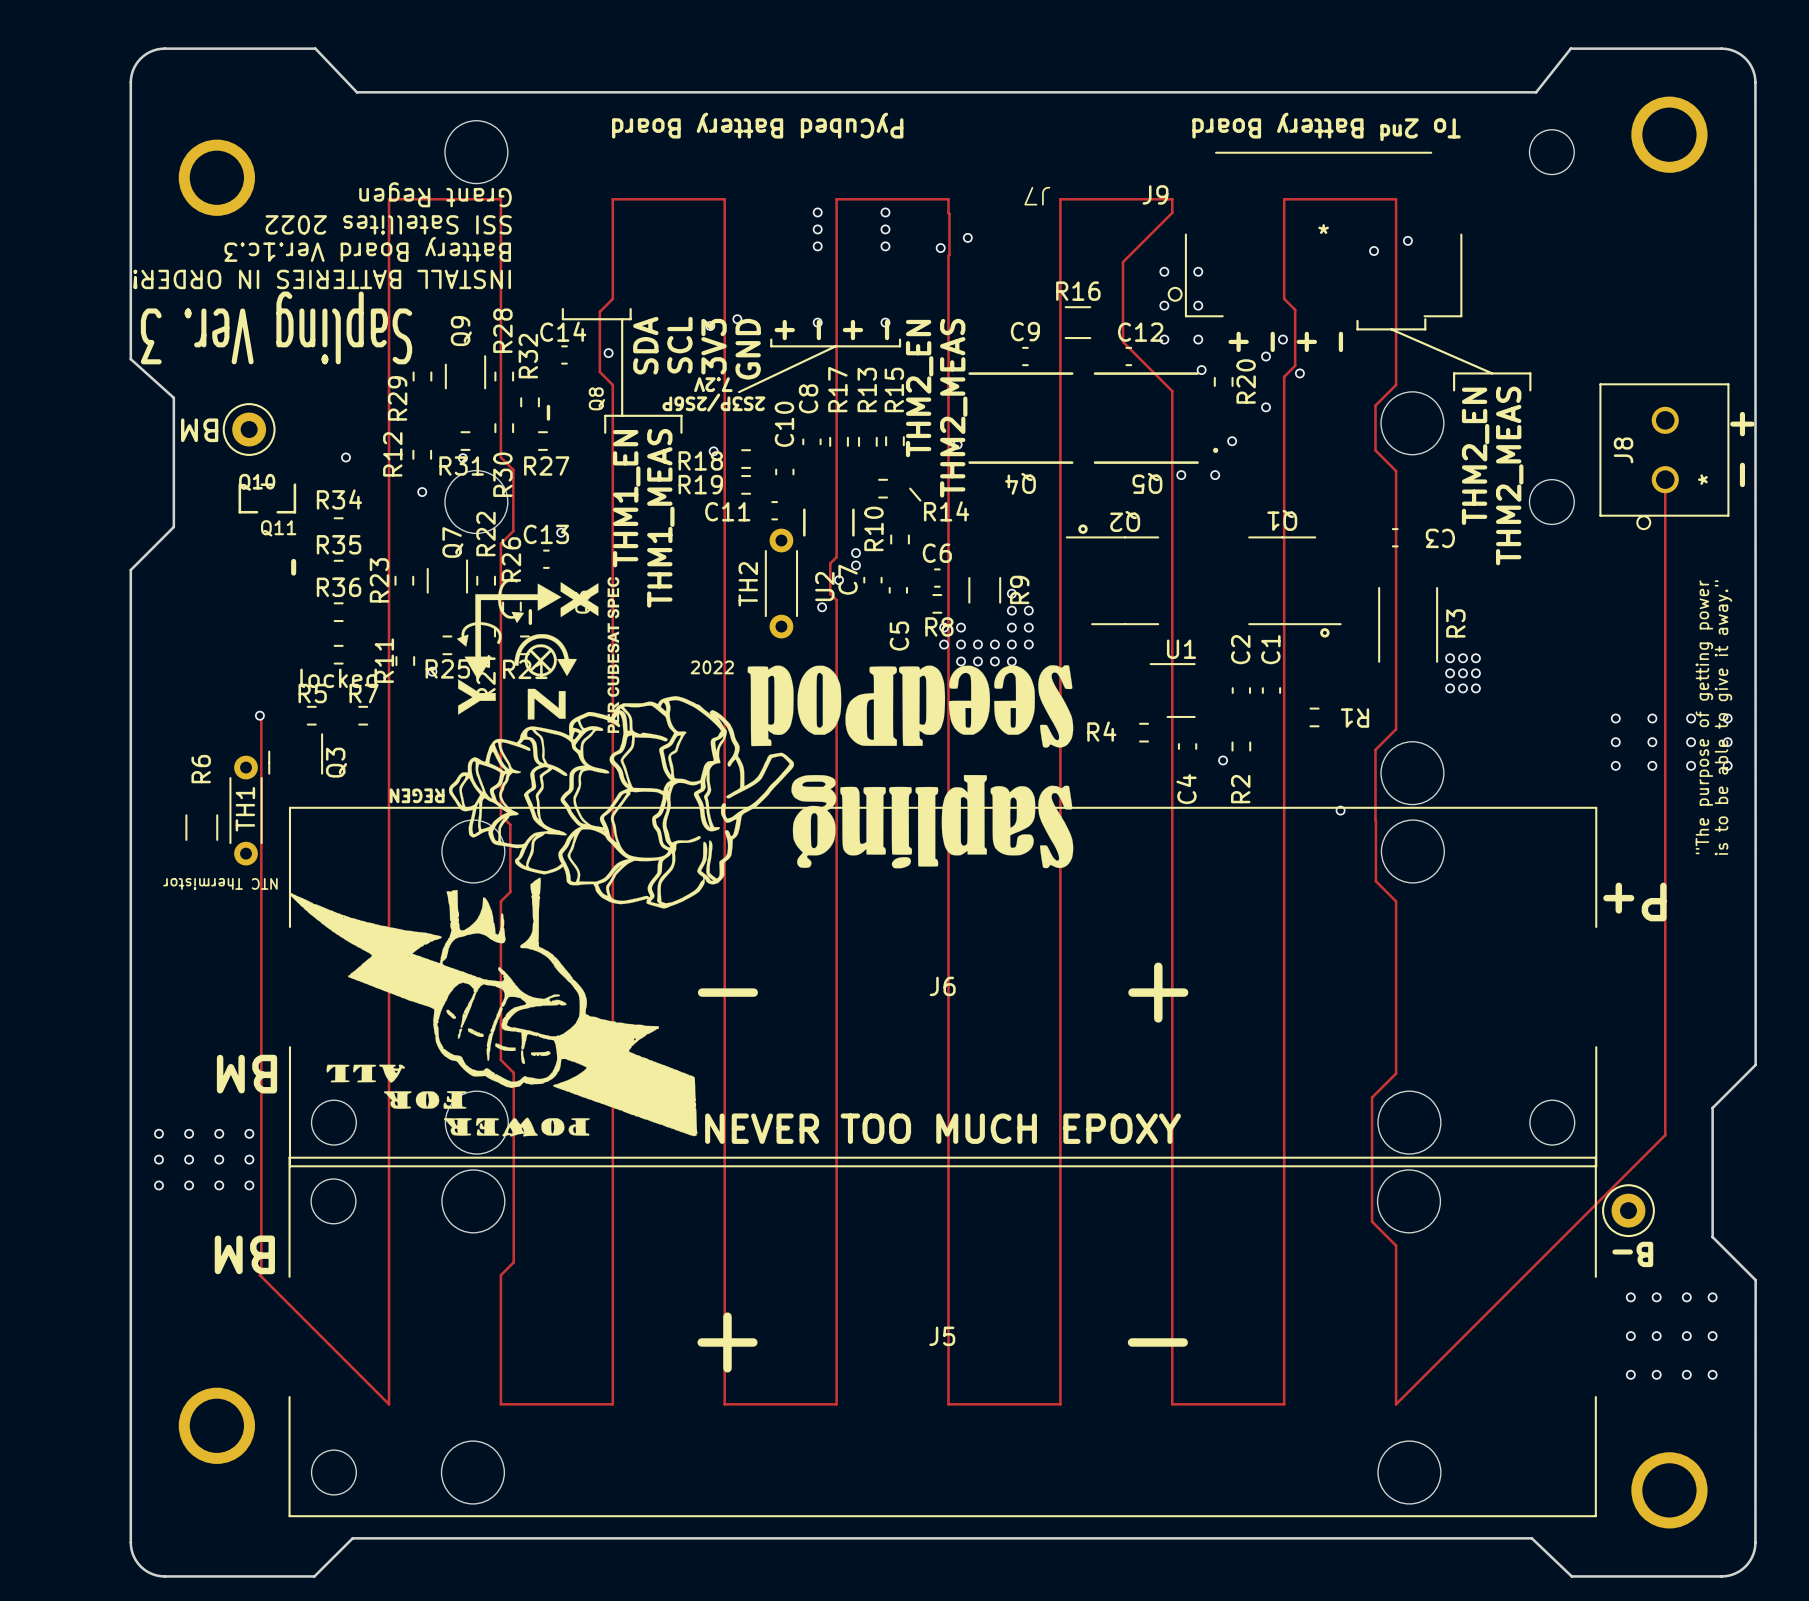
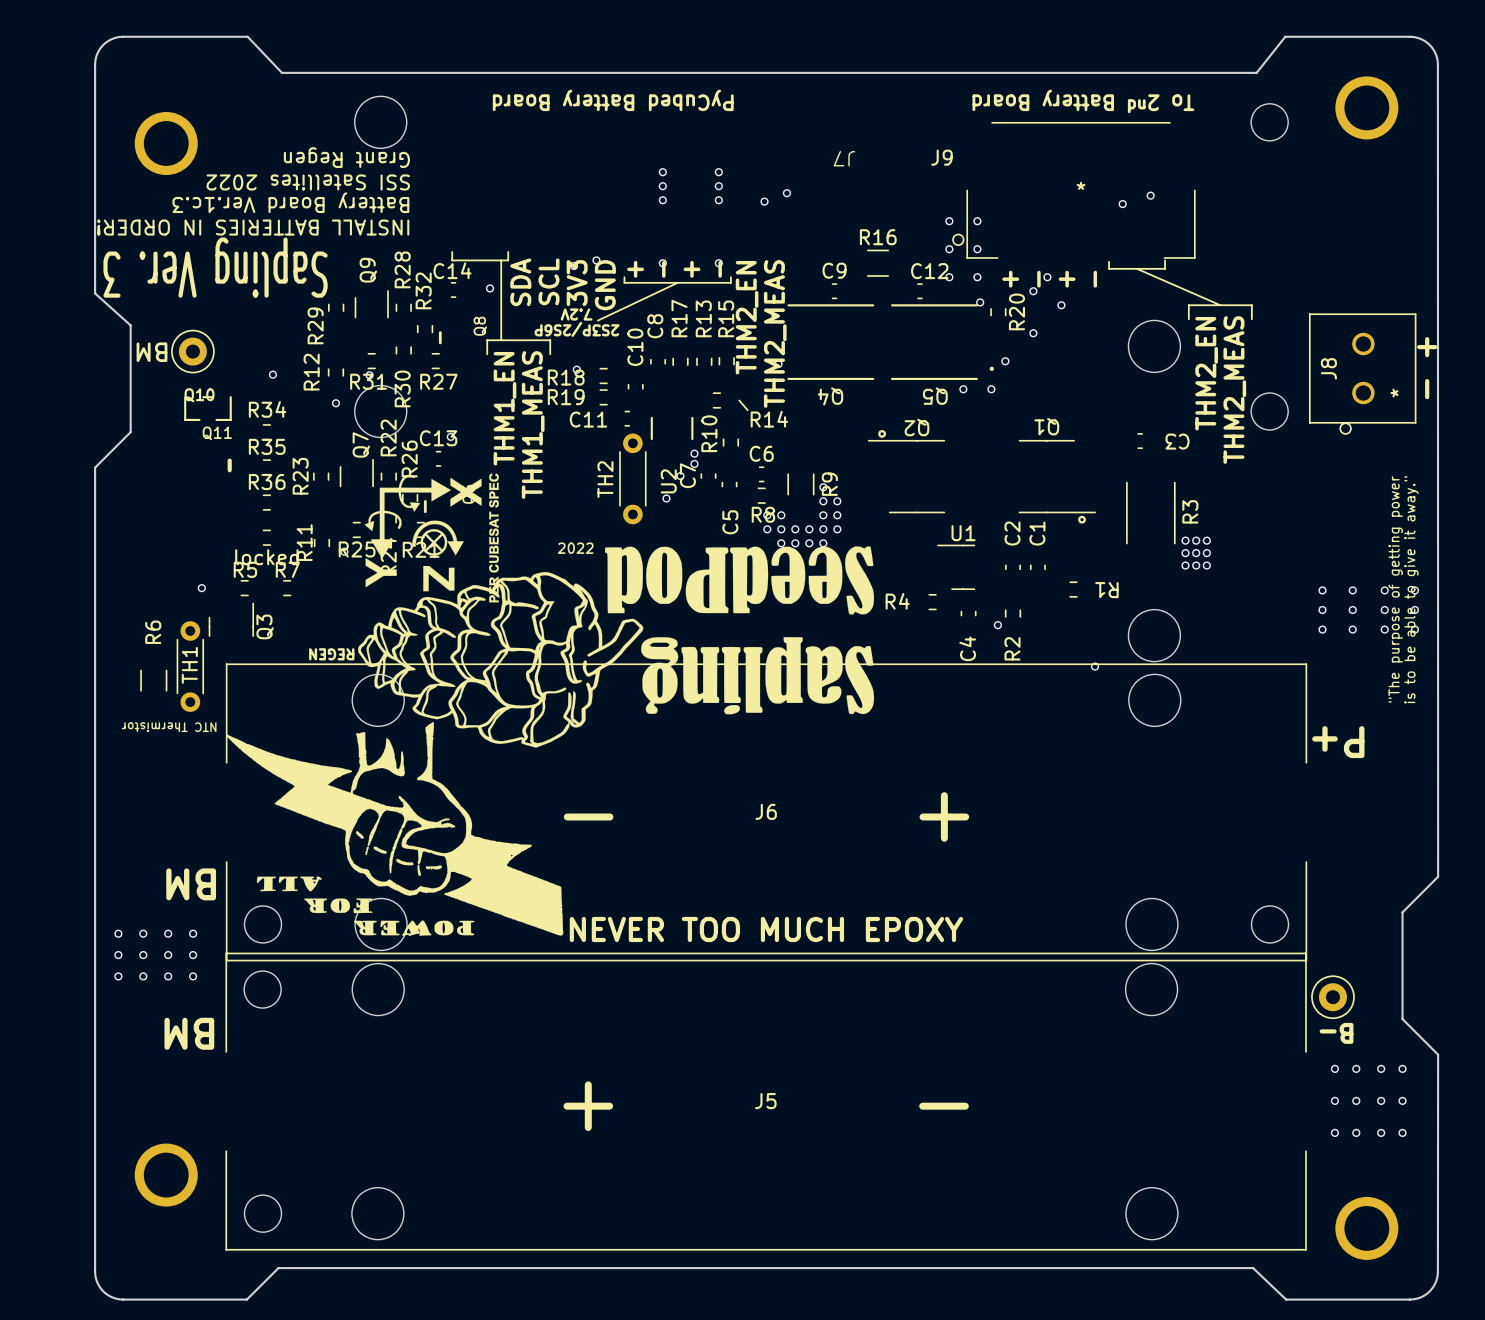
track: (1665, 479) (1665, 1135) (1396, 1404) (1396, 1245) (1372, 1221) (1372, 1097) (1396, 1073) (1396, 901) (1375, 881) (1375, 820) (1375, 749) (1396, 729) (1396, 471) (1375, 450) (1375, 405) (1396, 384) (1396, 199) (1284, 199) (1284, 298) (1295, 309) (1295, 365) (1284, 376) (1284, 1404) (1172, 1404) (1172, 391) (1123, 341) (1123, 262) (1172, 212) (1172, 199) (1060, 199) (1060, 1404) (948, 1404) (948, 199) (836, 199) (836, 557) (830, 563) (830, 593) (836, 600) (836, 1404) (724, 1404) (724, 199) (612, 199) (612, 298) (599, 311) (599, 372) (612, 384) (612, 1404) (500, 1404) (500, 1275) (513, 1262) (513, 1072) (500, 1060) (500, 901) (510, 892) (510, 824) (500, 815) (500, 543) (513, 531) (513, 469) (500, 457) (500, 199) (389, 199) (389, 1404) (259, 1275) (259, 715) -> none

